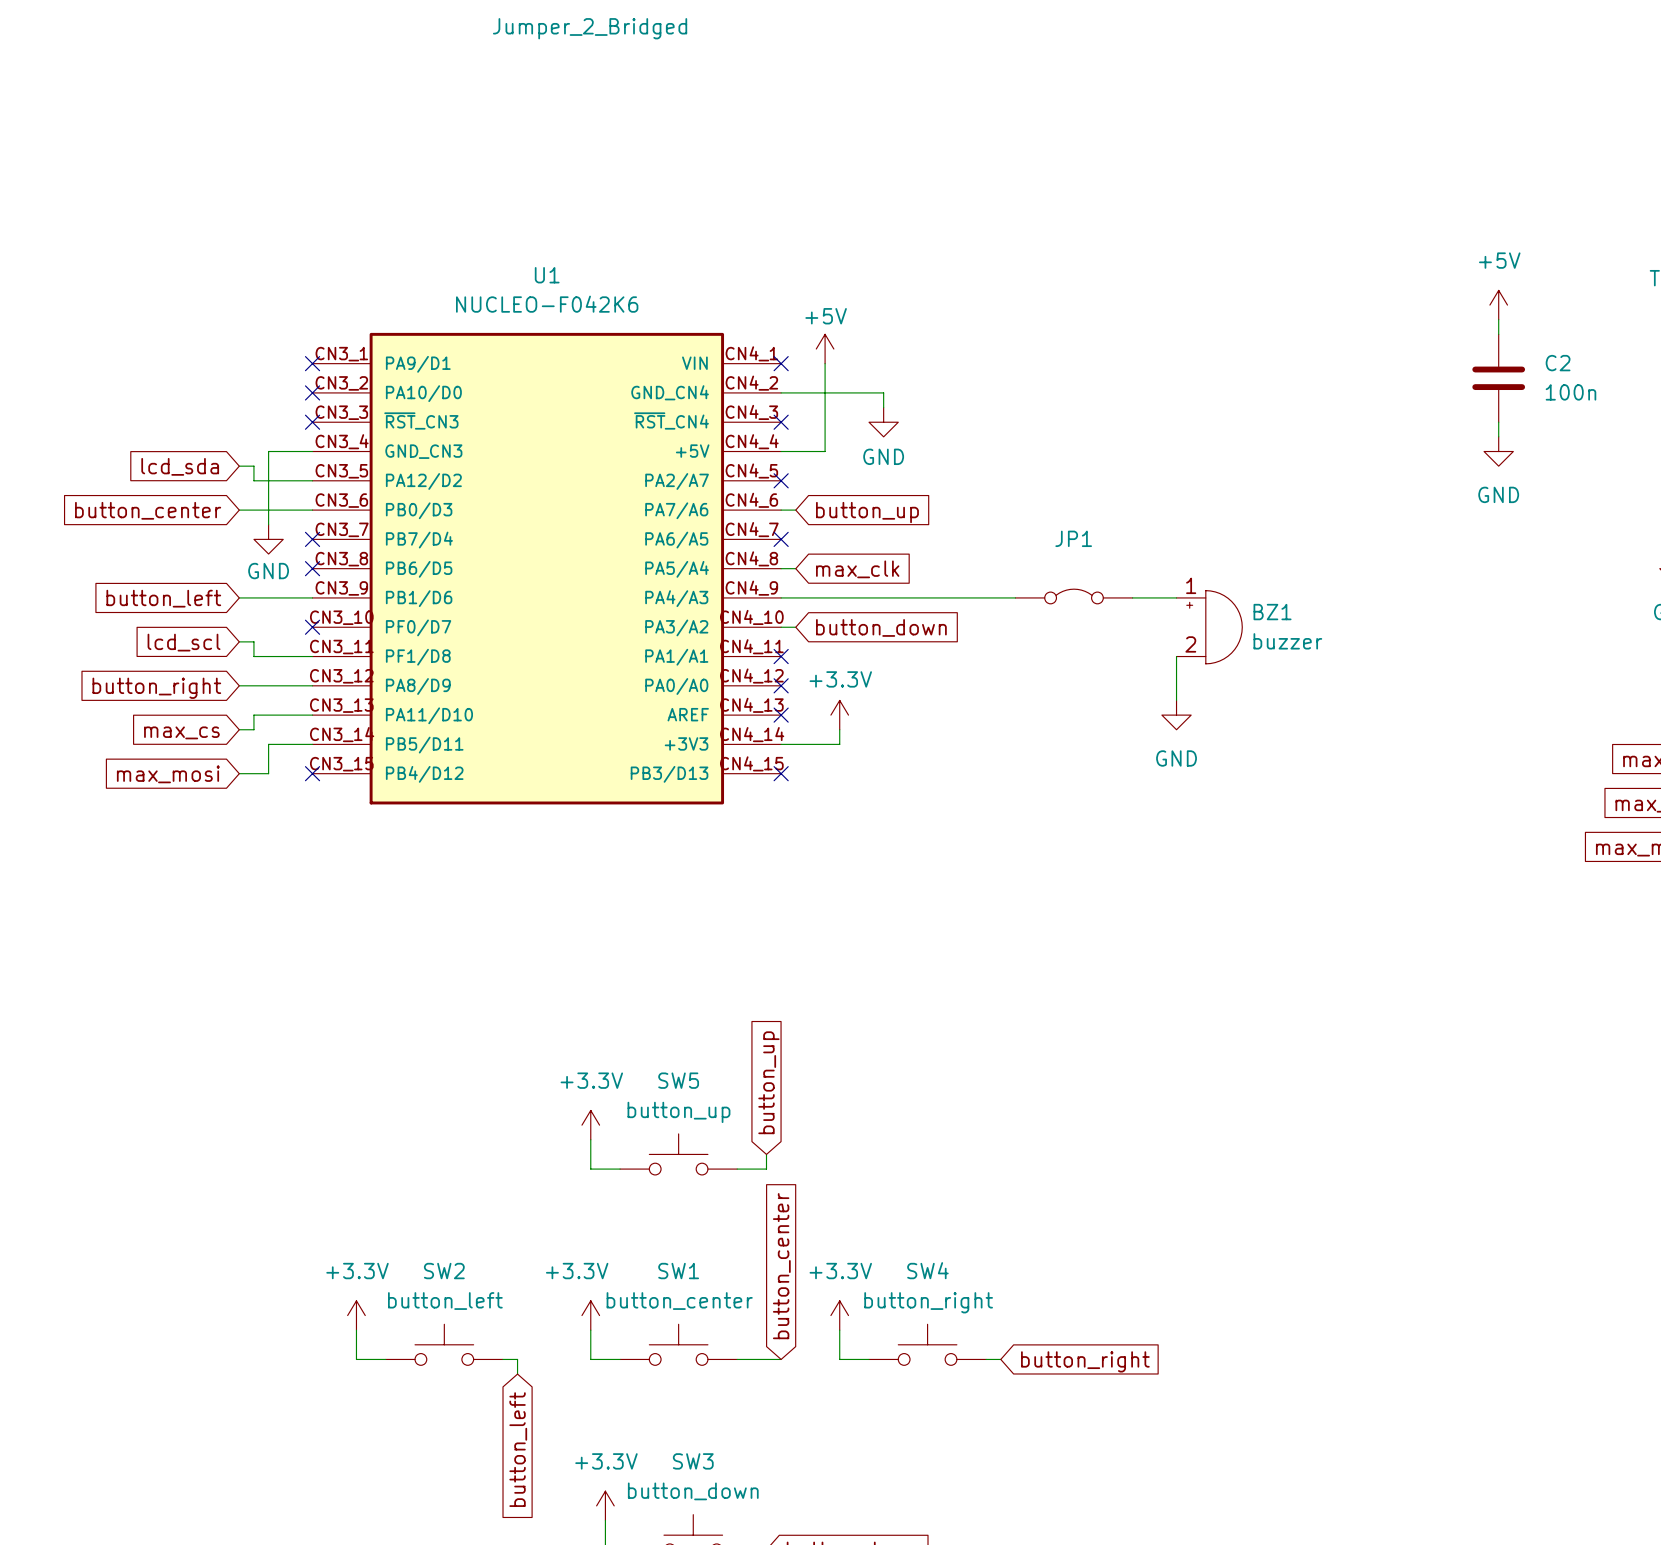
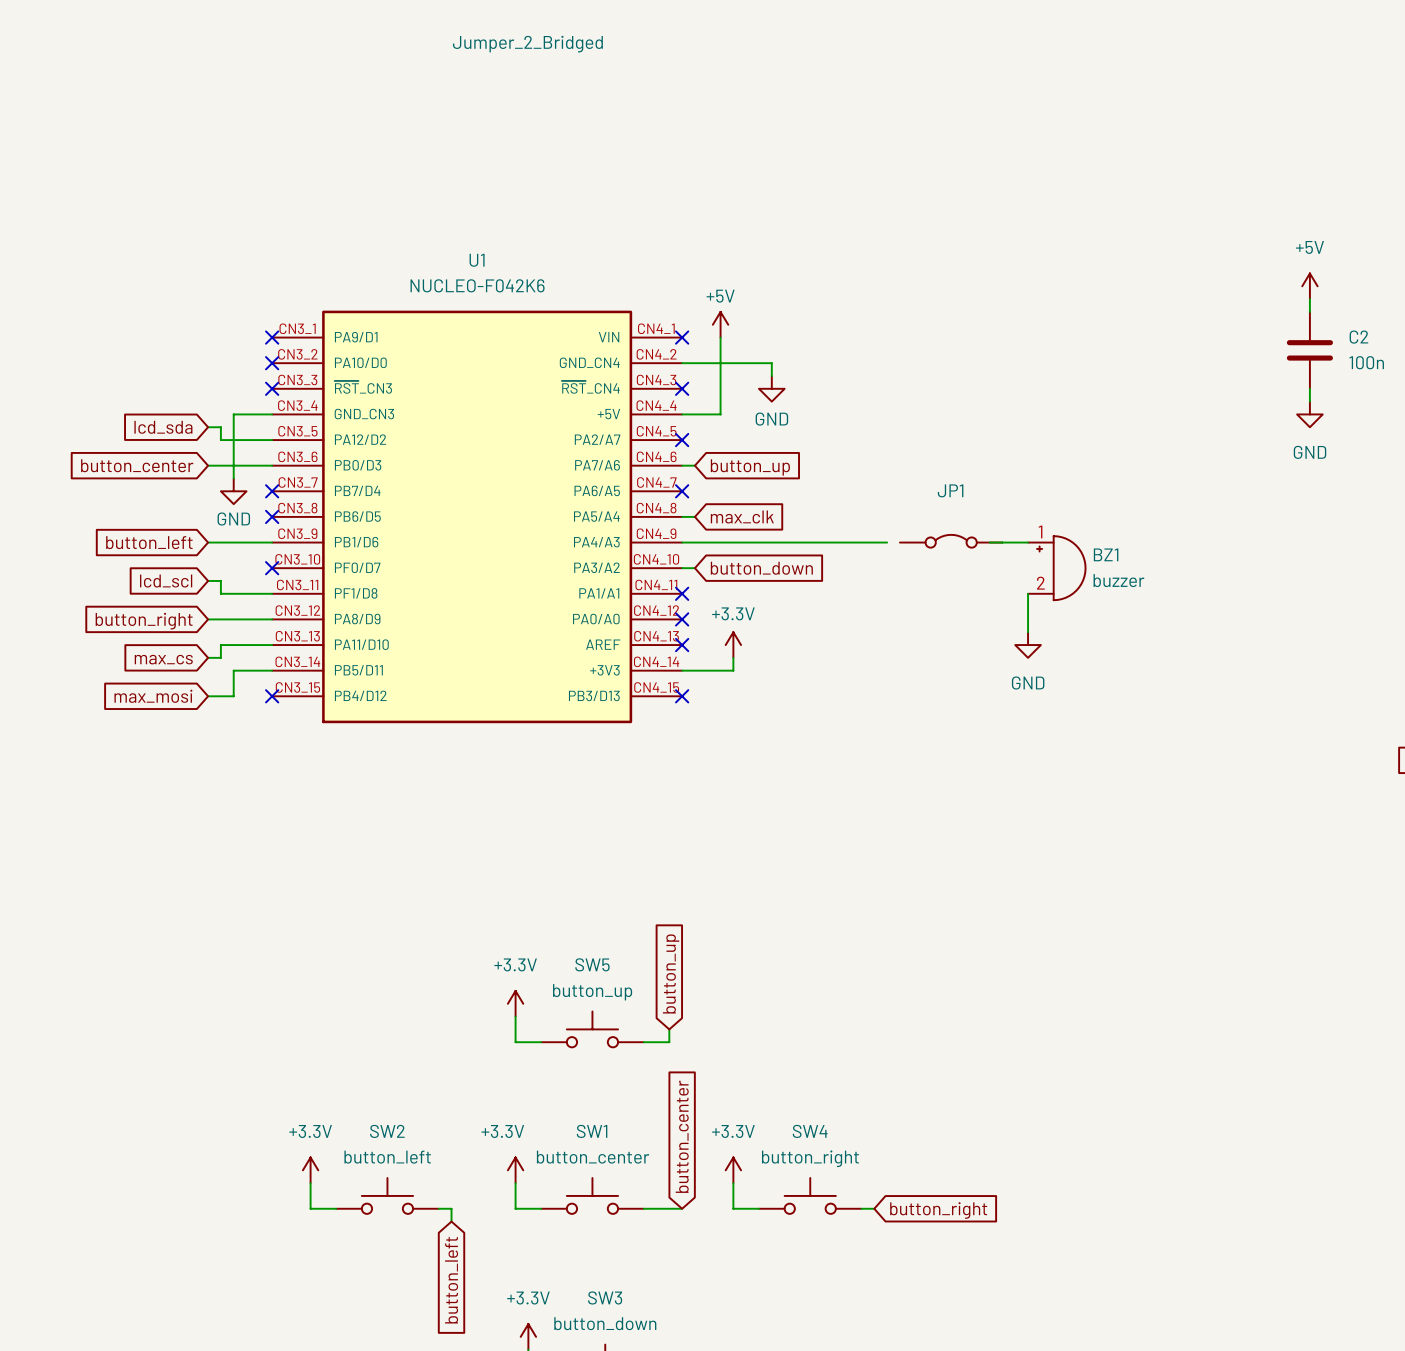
JP1 position: (1074, 596) -> (951, 541)

